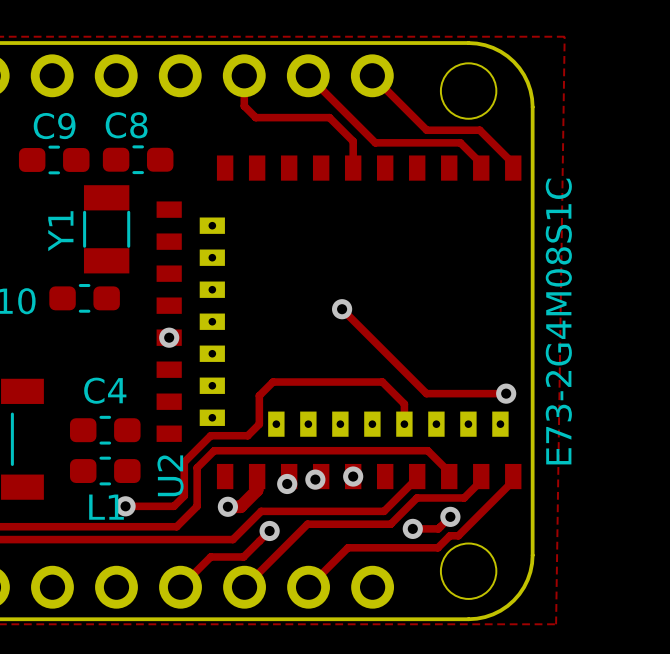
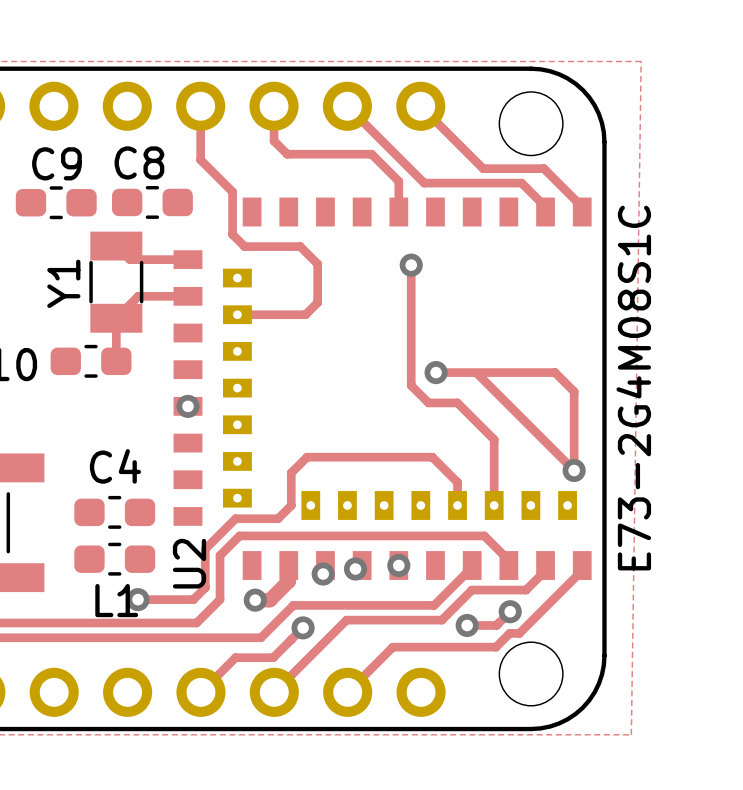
track: none -> (200, 106) (200, 159) (232, 191) (232, 234) (244, 246) (300, 246) (317, 263) (317, 302) (305, 314) (237, 314)
track: none -> (116, 246) (129, 259) (187, 259)
track: none -> (411, 265) (411, 385) (428, 402) (457, 402) (494, 439) (494, 505)
via: none -> (411, 265)
track: none -> (187, 296) (138, 296) (116, 318) (116, 361)
track: none -> (436, 372) (555, 372) (574, 391) (574, 470) (477, 373)
track: (342, 309) (426, 393) (506, 393) -> none
via position: (342, 309) -> (436, 372)

